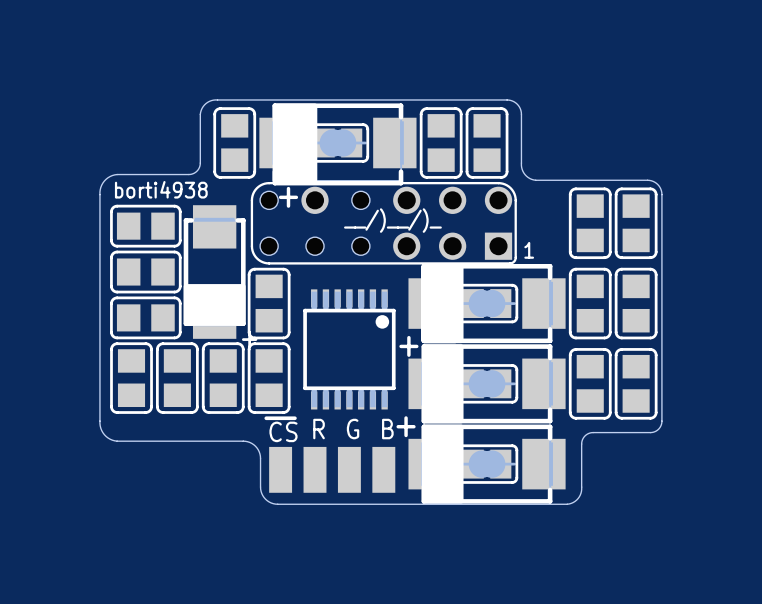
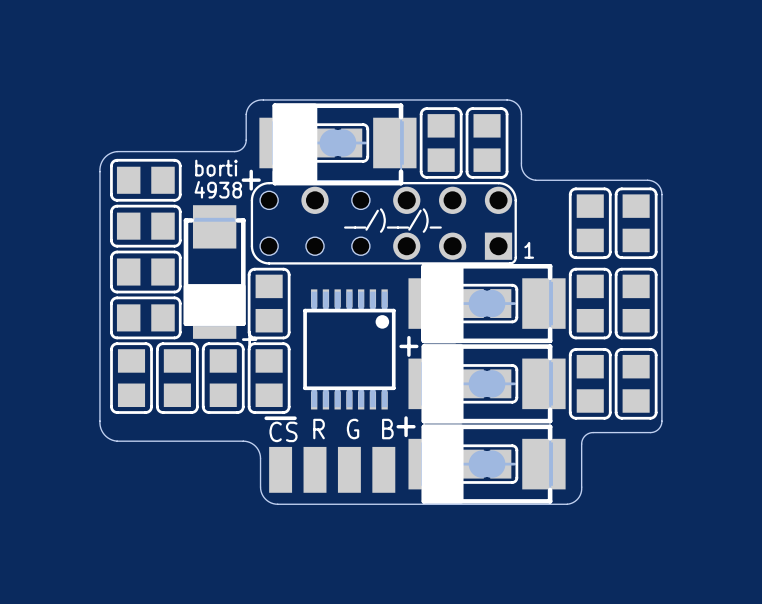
board edge: (263, 99) (215, 99) (204, 105) (200, 114) (200, 164) (194, 173) (114, 174) (102, 182) (99, 194) -> (263, 99) (255, 101) (247, 108) (246, 141) (240, 150) (112, 152) (106, 156) (100, 164) (99, 194)
part rotation: 0° (234, 142) -> 90° clockwise (145, 180)
part position: (234, 142) -> (145, 180)
text: none -> borti (216, 168)
text: borti4938 (161, 189) -> none
text: none -> 4938 (218, 189)
text position: + (288, 197) -> + (251, 180)

